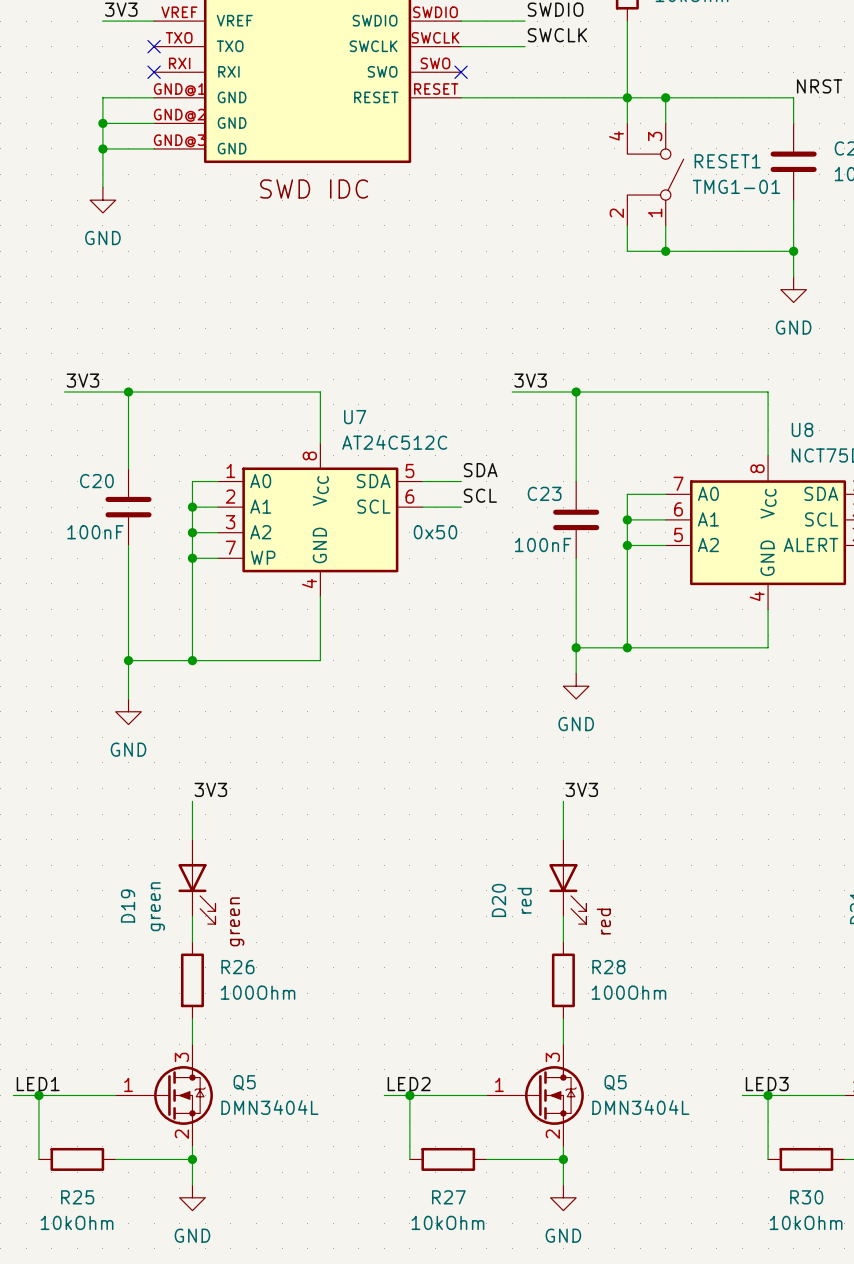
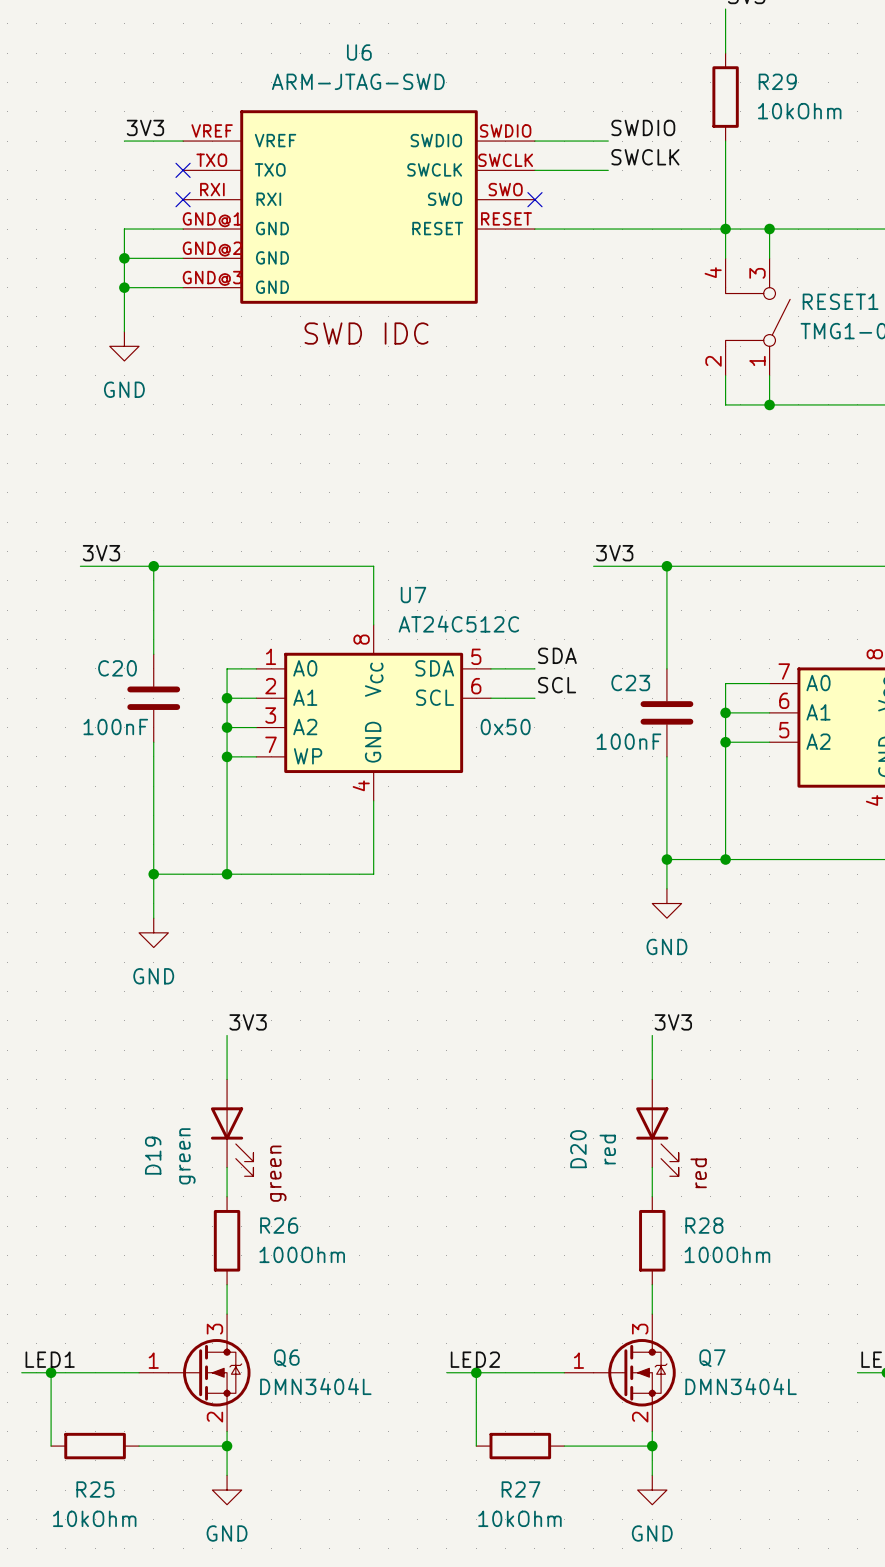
Q5 name: Q5 (244, 1082) -> Q6 (286, 1358)
Q5 name: Q5 (615, 1082) -> Q7 (712, 1358)

